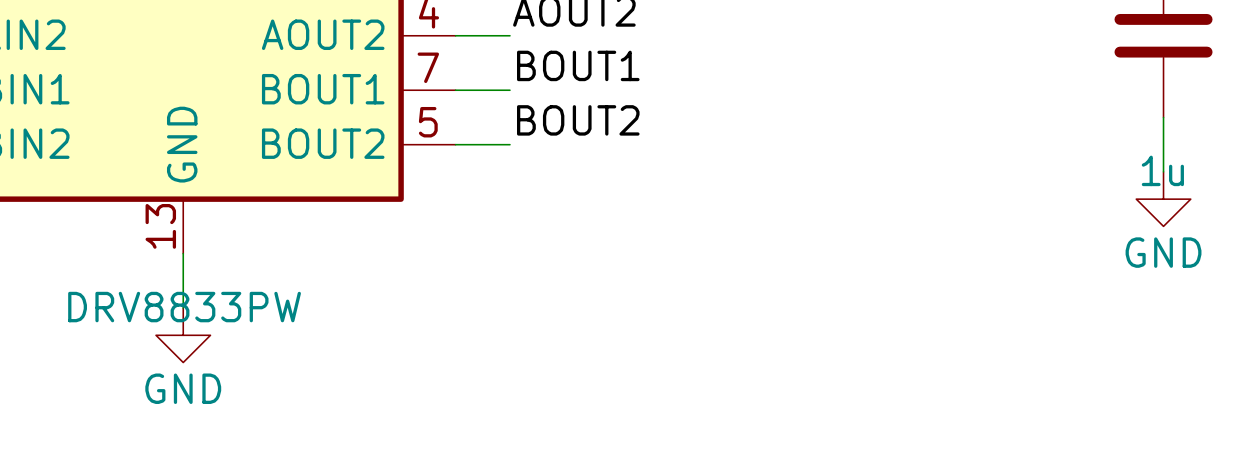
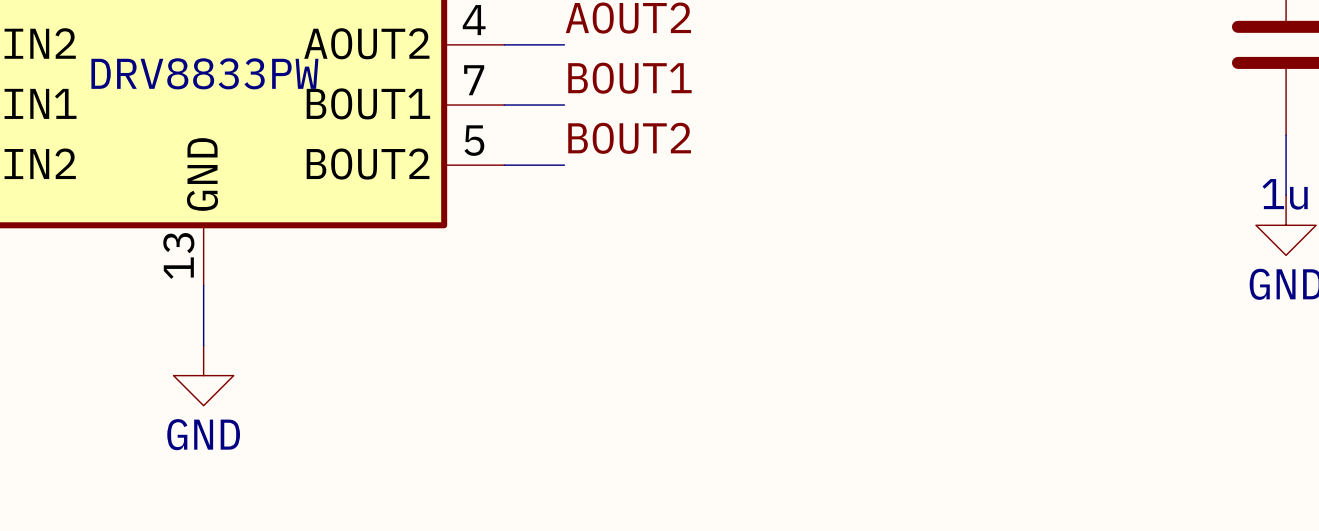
part value position: DRV8833PW (184, 307) -> DRV8833PW (204, 73)

